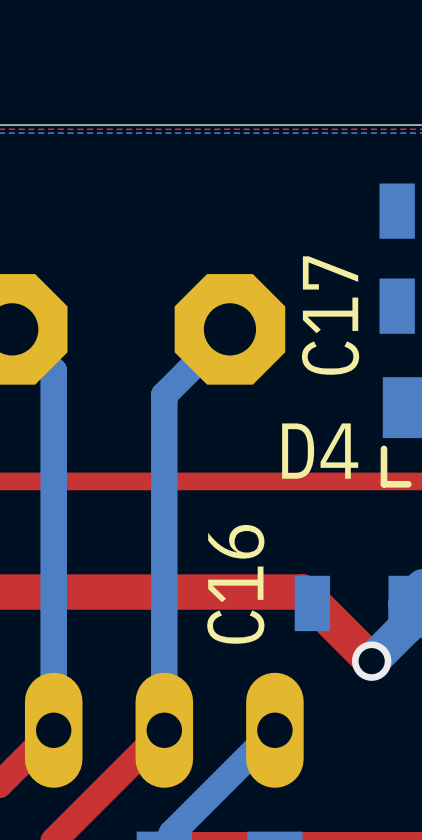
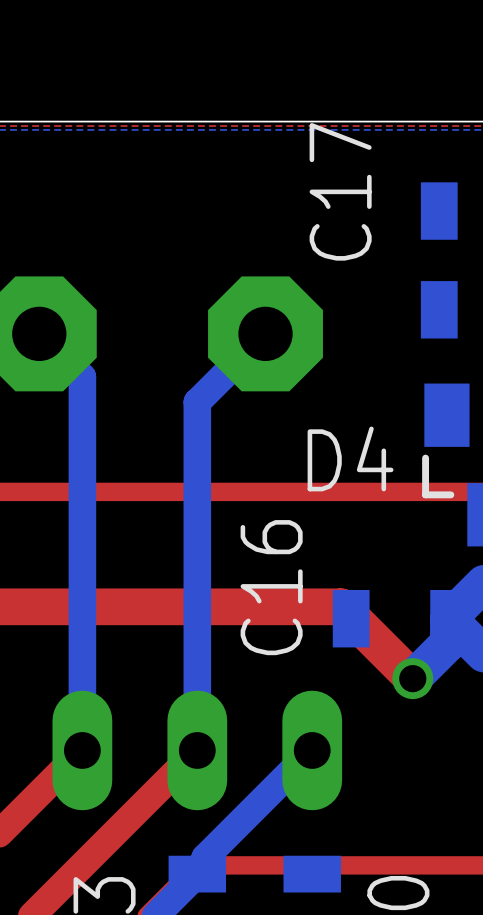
C17 name position: C17 (330, 315) -> C17 (340, 191)

